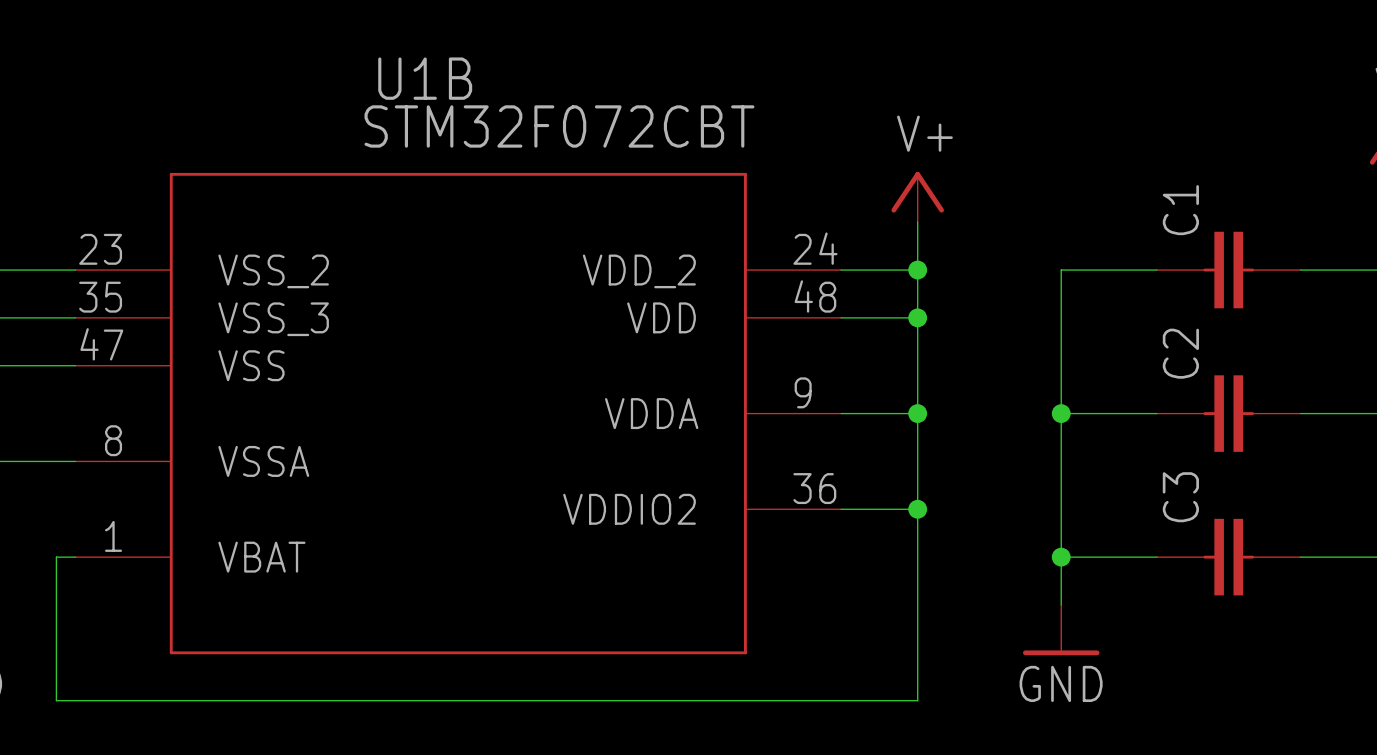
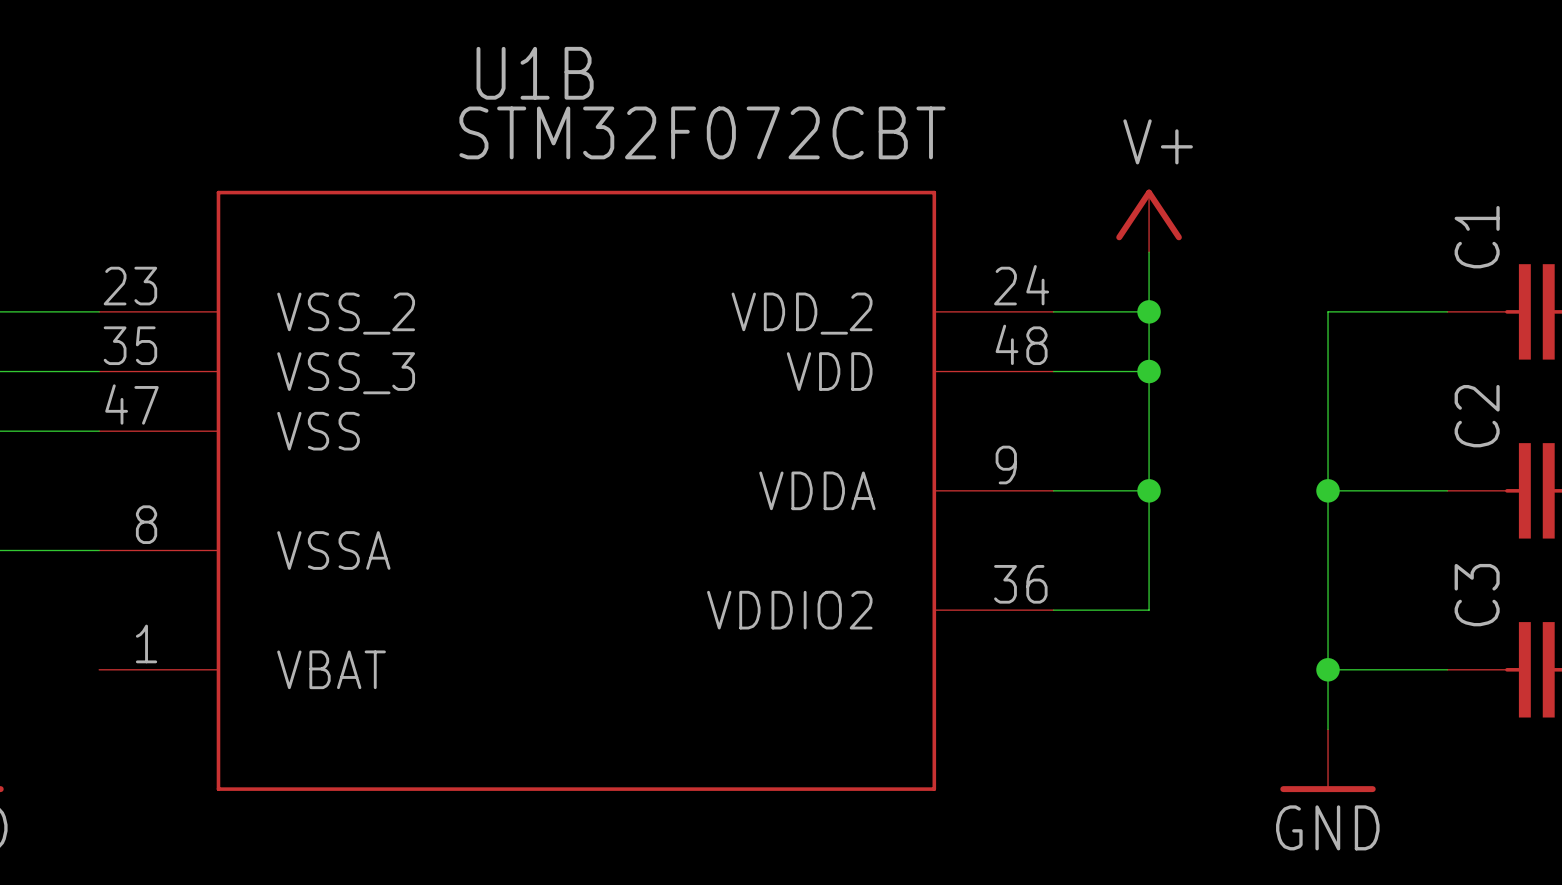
wire: (917, 509) (917, 700) (56, 700) (56, 557) (75, 557) -> none
junction: (917, 509) -> none

